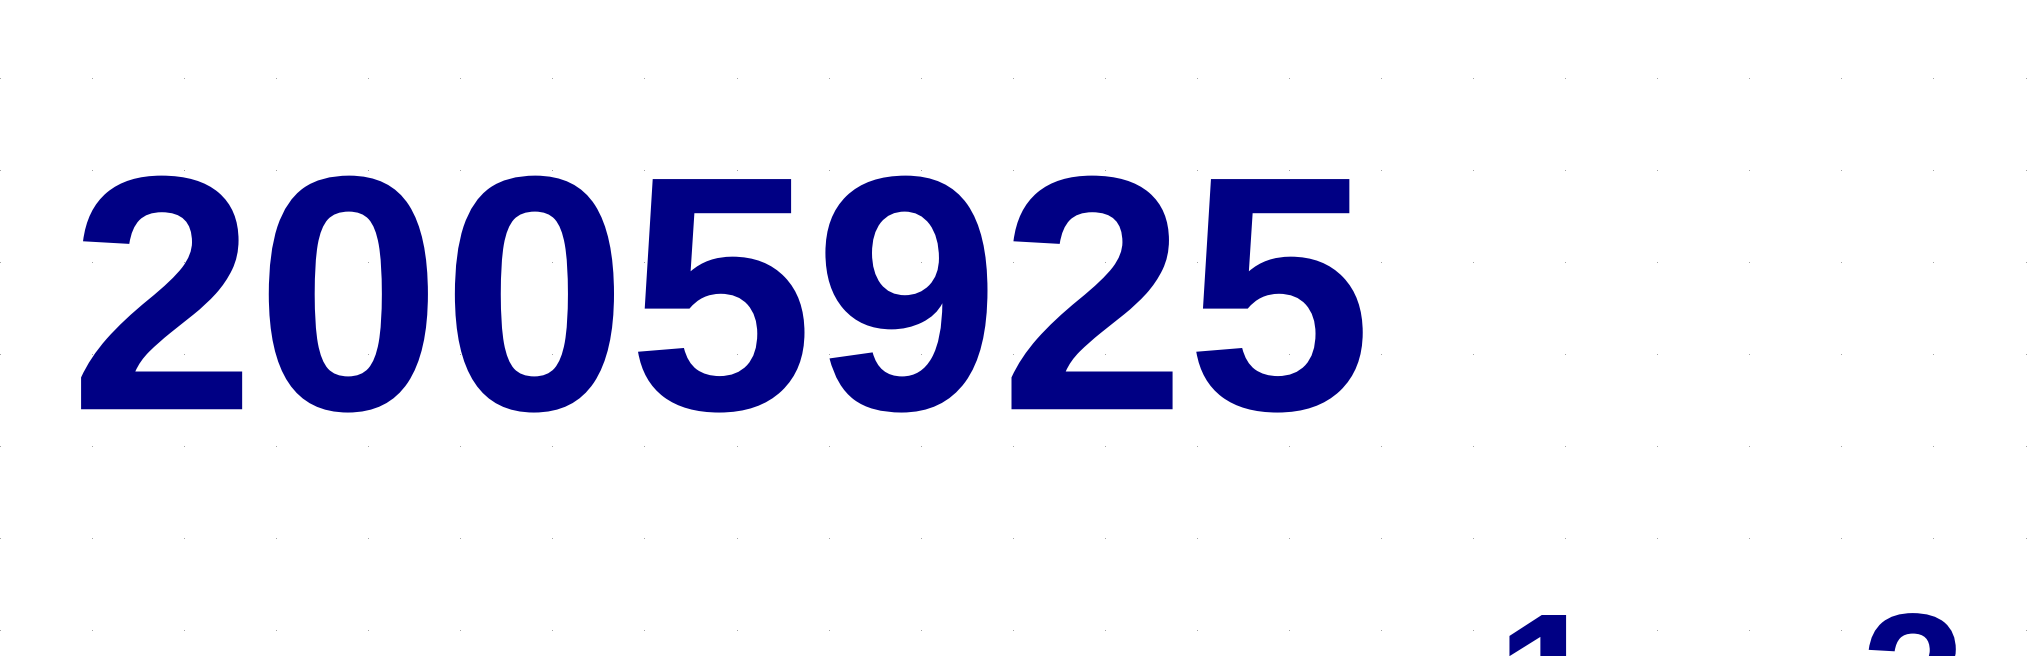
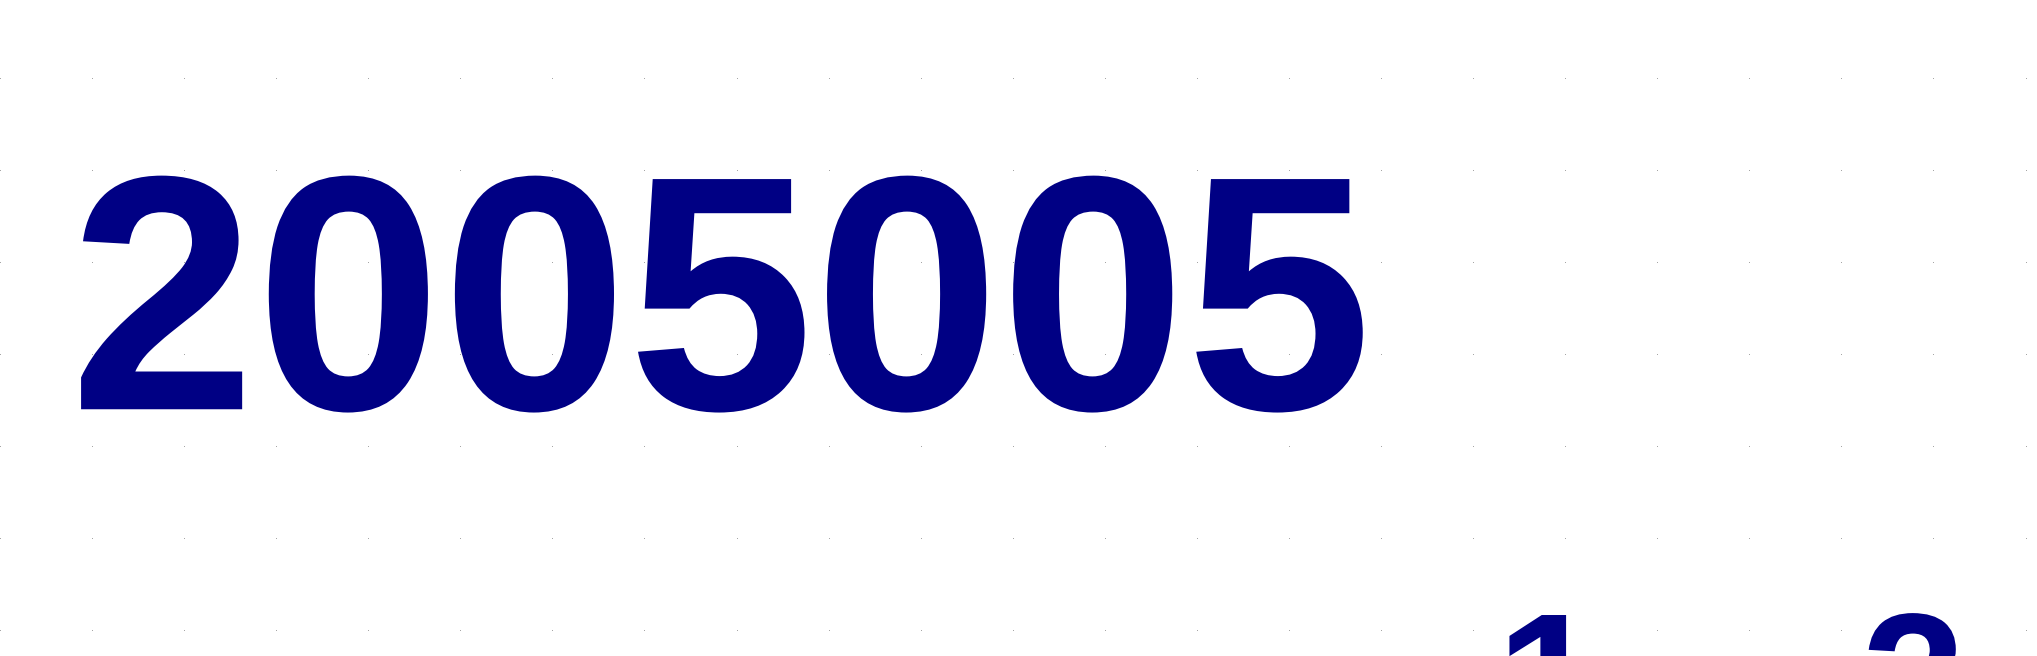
text: 2005925 (721, 294) -> 2005005 (721, 294)

